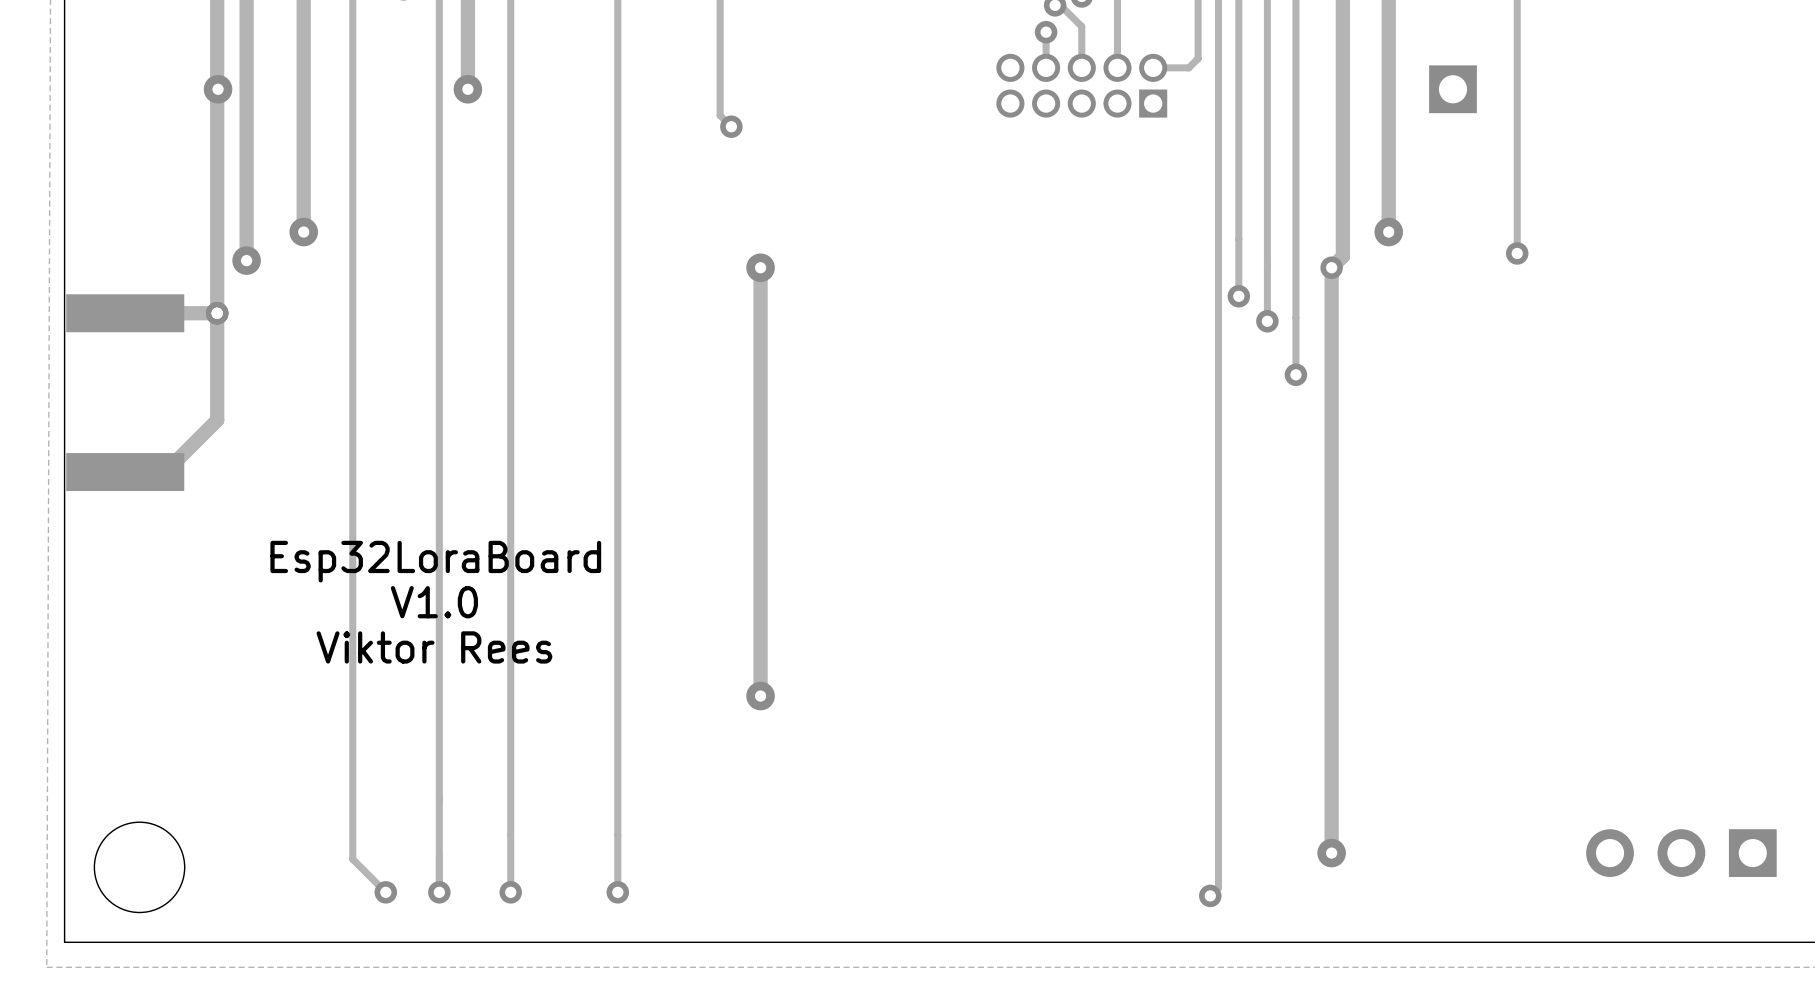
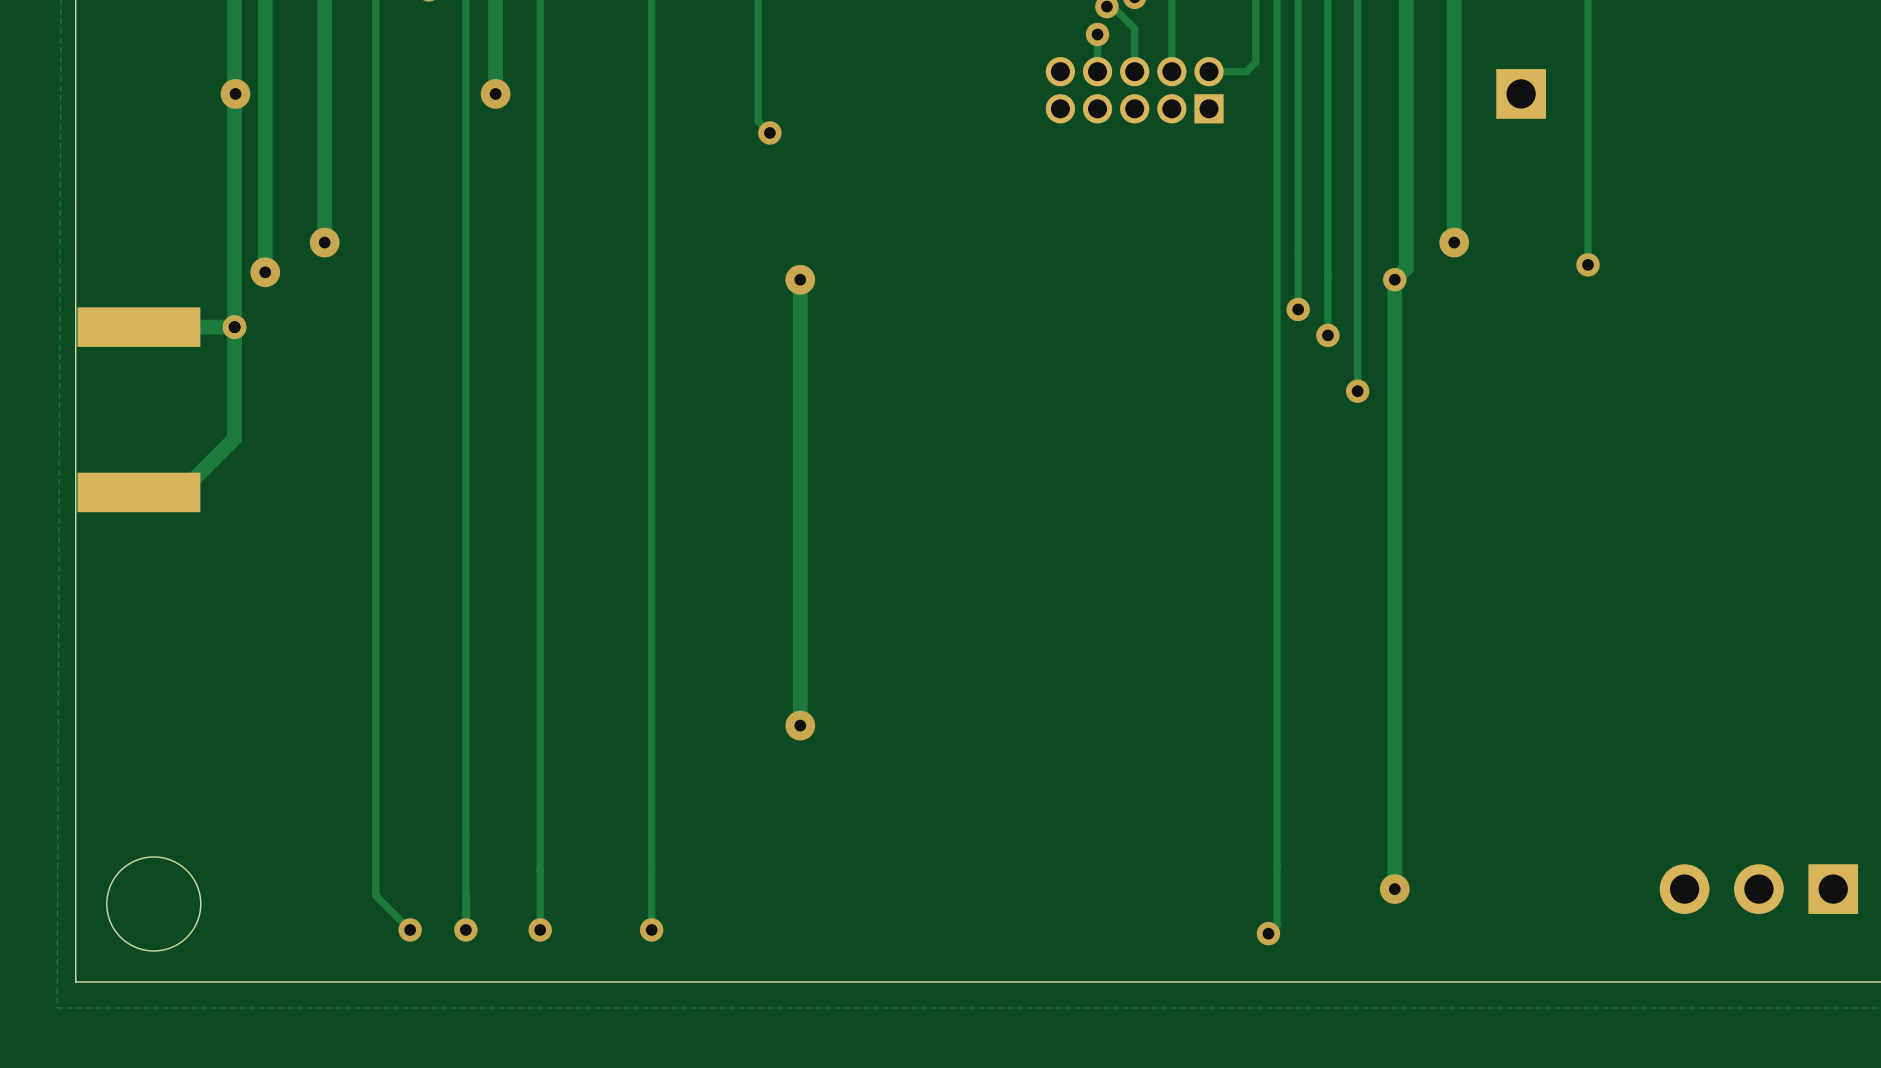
text: Esp32LoraBoard (435, 561) -> none
text: V1.0 (434, 602) -> none
text: Viktor Rees (434, 647) -> none

